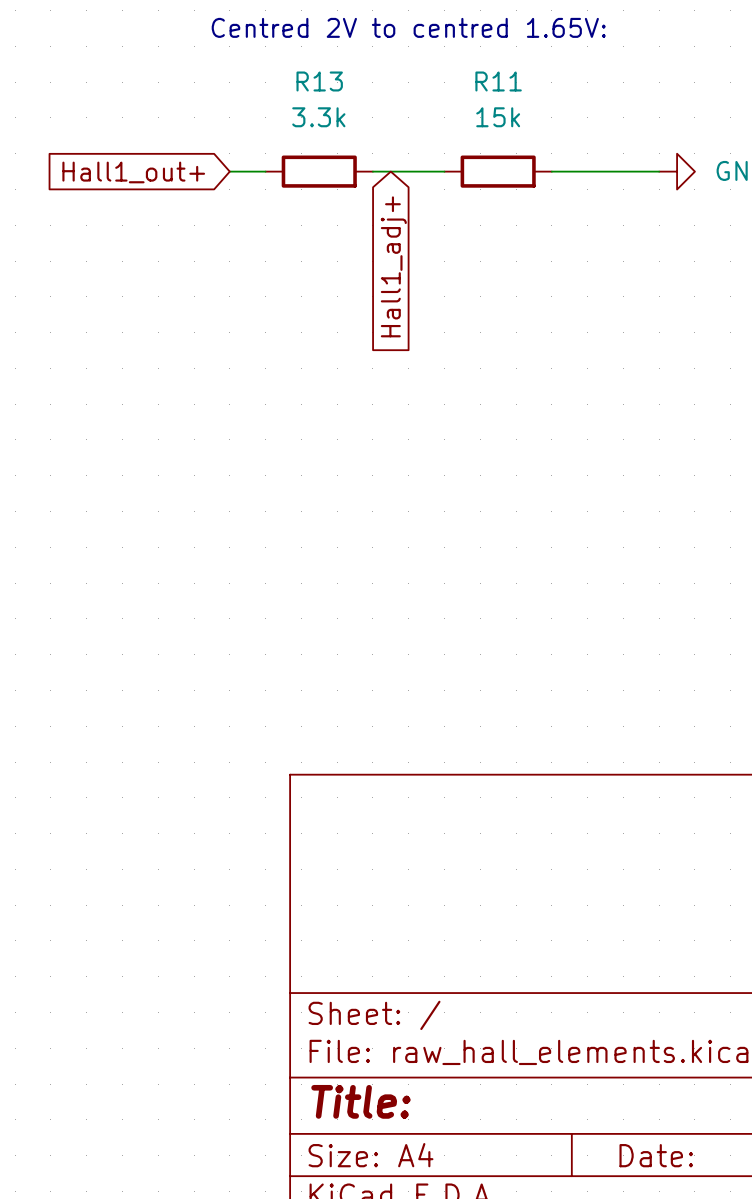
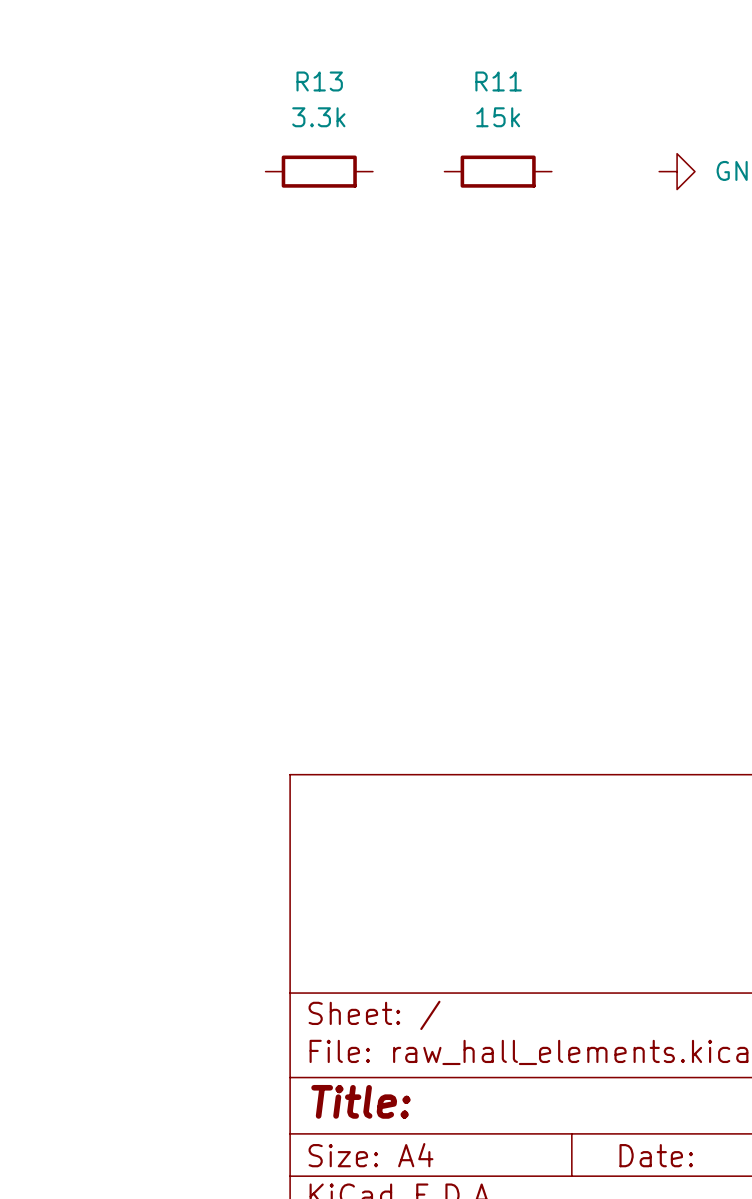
text: Centred 2V to centred 1.65V: (408, 27) -> none
wire: (229, 171) (265, 171) -> none
wire: (372, 171) (444, 171) -> none
wire: (551, 171) (659, 171) -> none
global label: Hall1_out+ (133, 172) -> none
global label: Hall1_adj+ (393, 266) -> none

